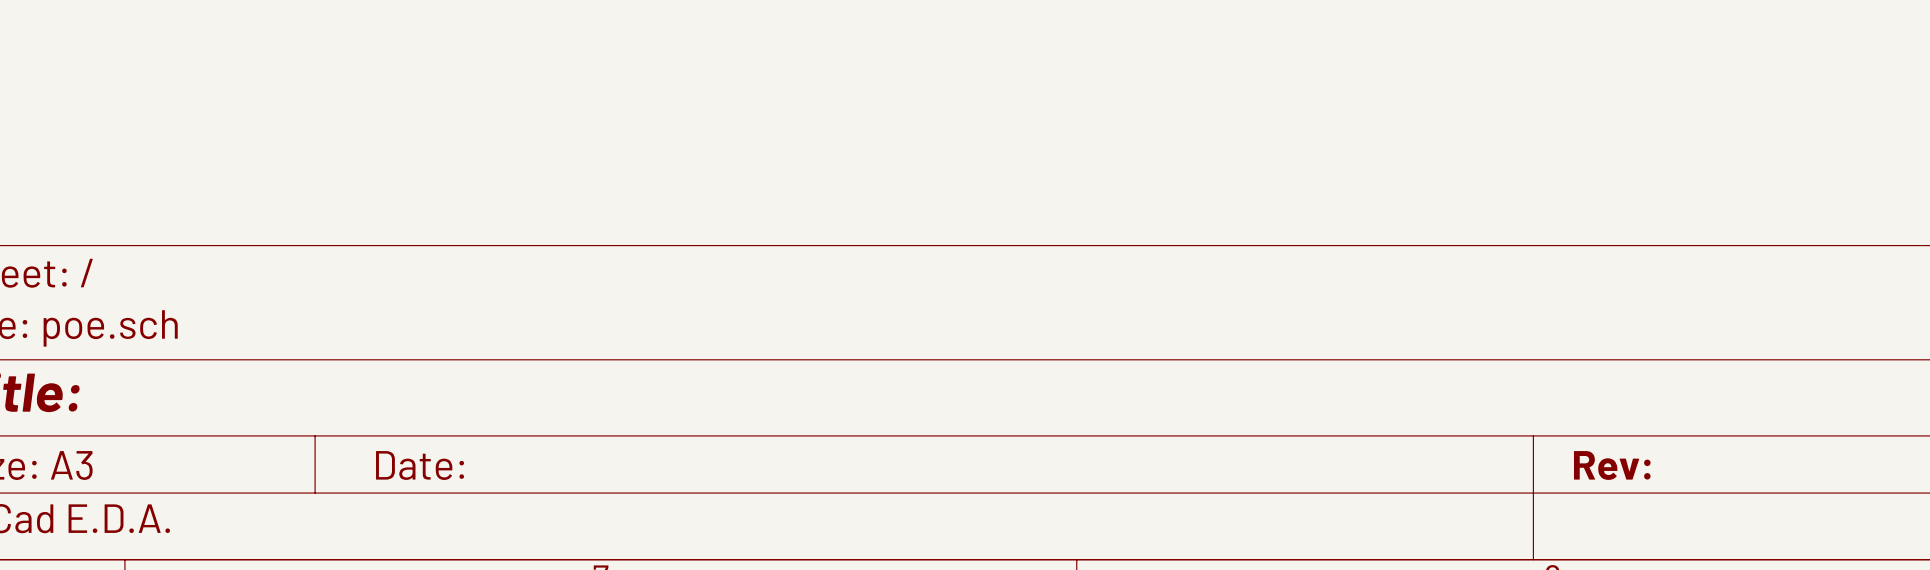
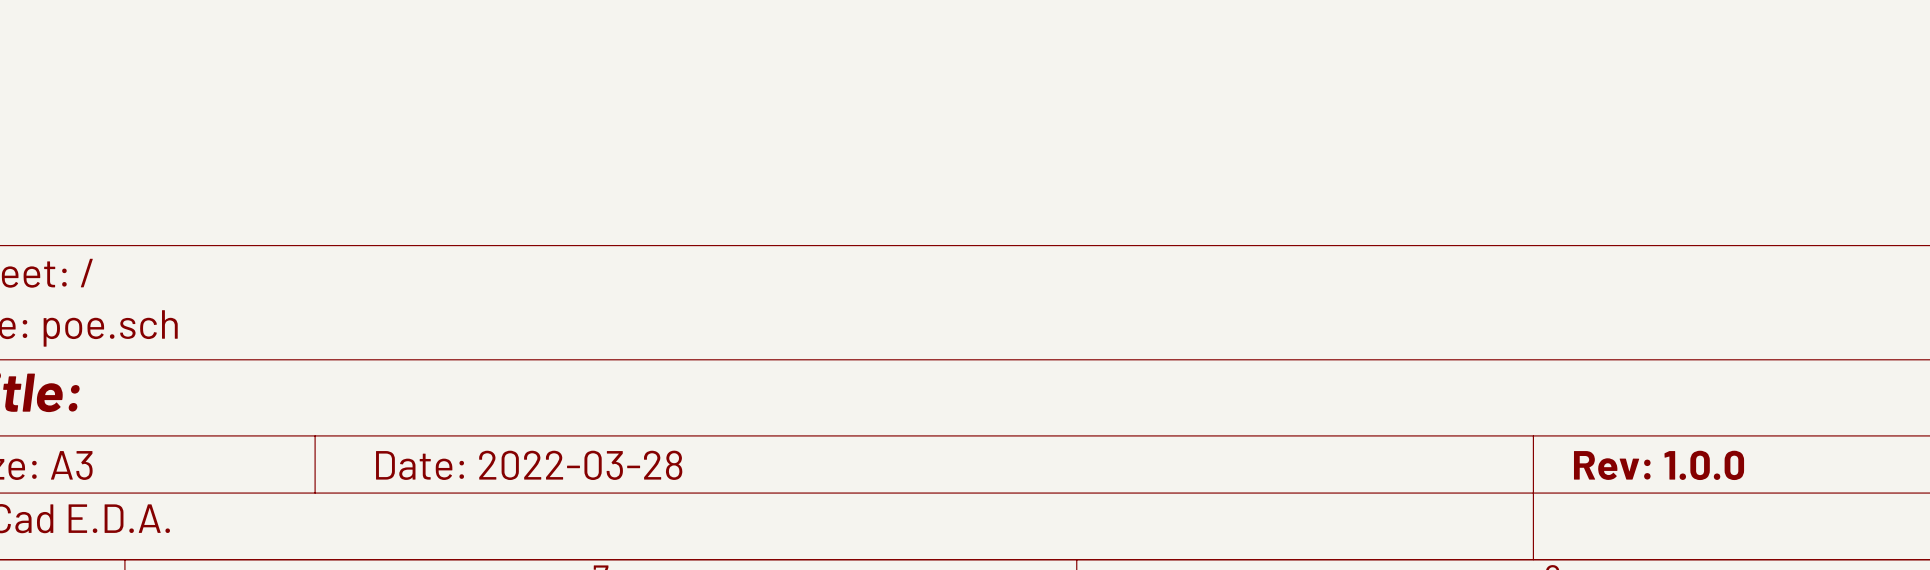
title block: Date: (420, 465) -> Date: 2022-03-28 (529, 465)
title block: Rev: (1612, 465) -> Rev: 1.0.0 (1659, 465)

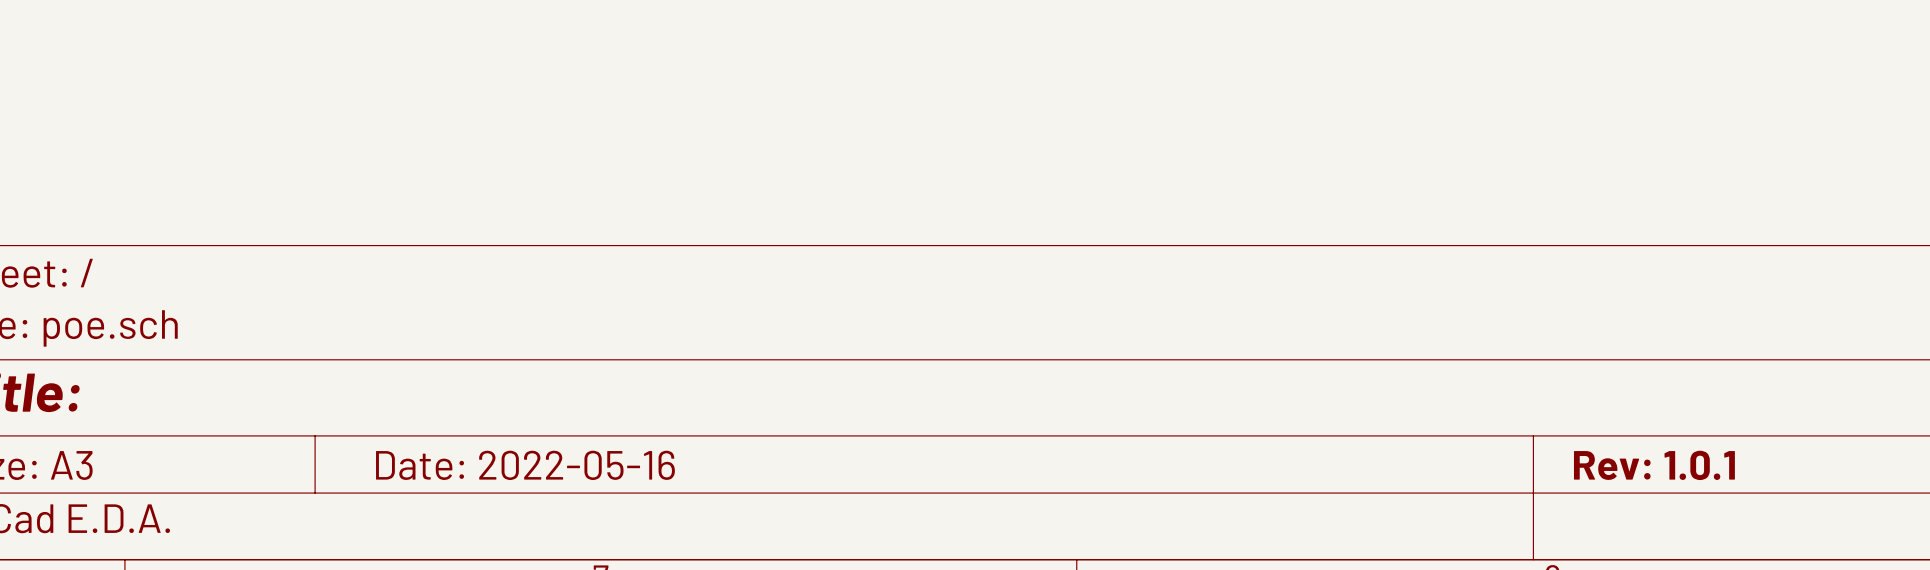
title block: Date: 2022-03-28 (529, 465) -> Date: 2022-05-16 (525, 465)
title block: Rev: 1.0.0 (1659, 465) -> Rev: 1.0.1 (1654, 465)

